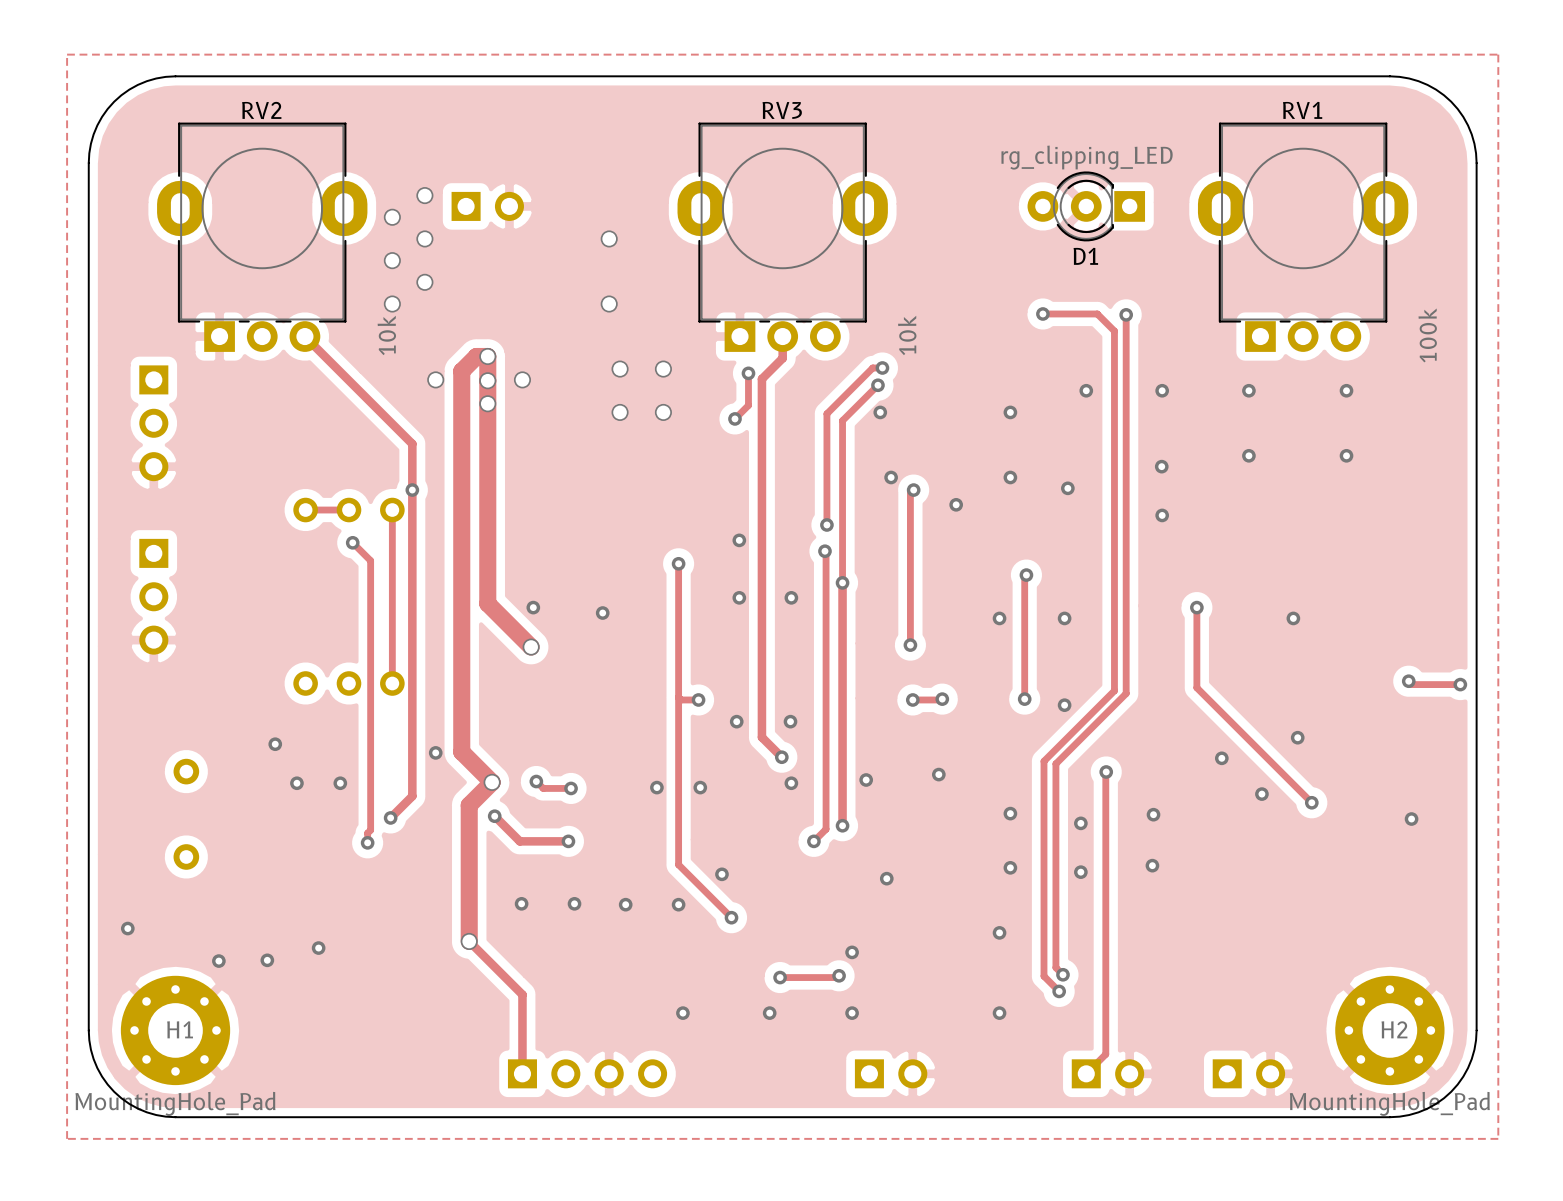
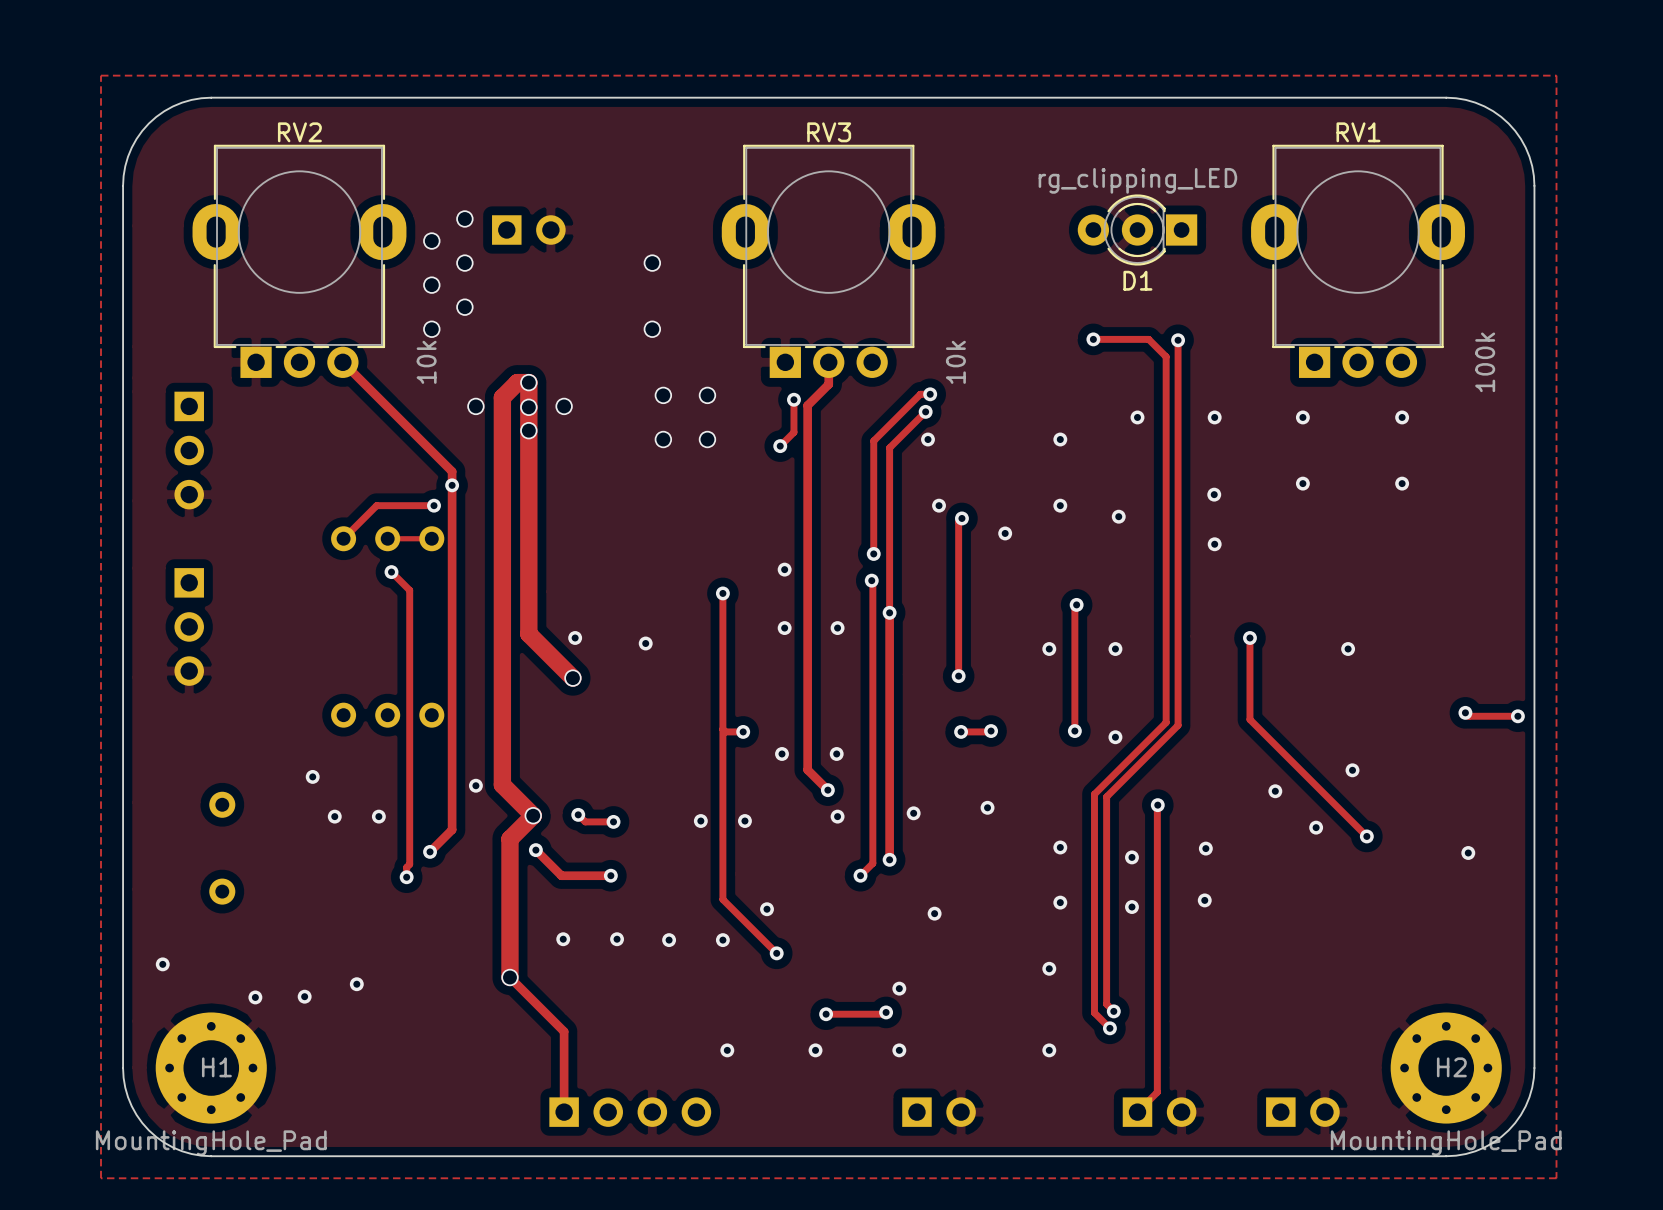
via: none -> (452, 485)
track: none -> (434, 505) (376, 505) (343, 538)
via: none -> (434, 505)
via: (412, 490) -> none
track: (307, 510) (348, 510) -> (431, 538) (387, 538)
track: (392, 510) (392, 683) -> none

